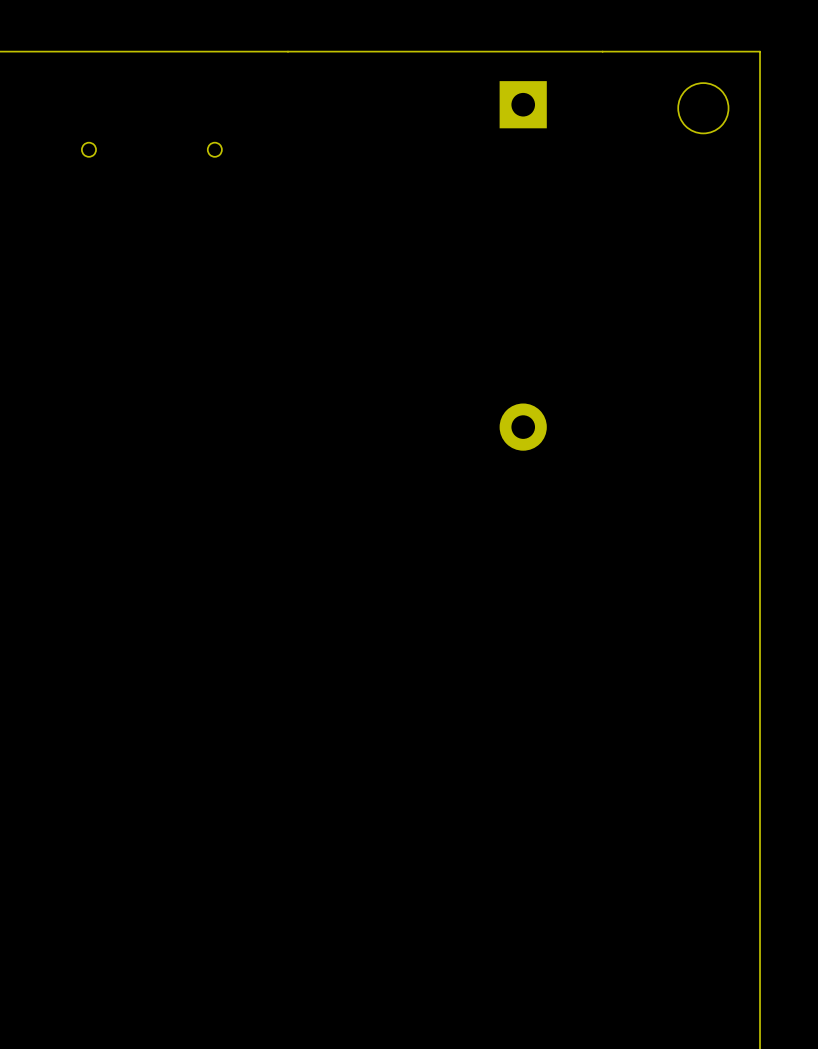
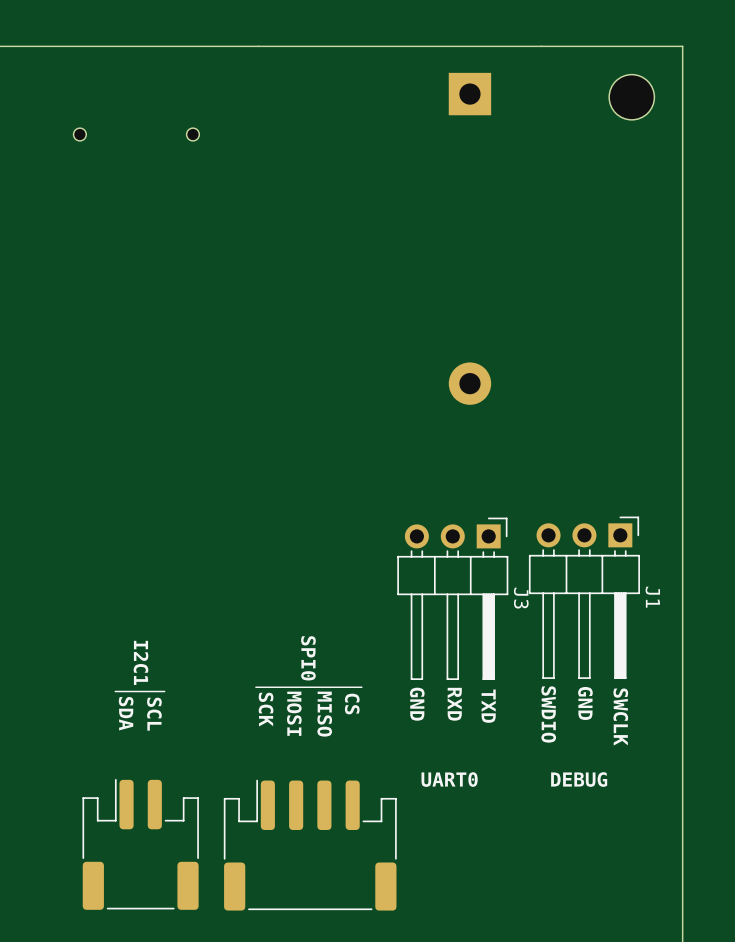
J1: none -> (584, 597)
J3: none -> (452, 598)
text: none -> SPI0 (308, 658)
text: none -> I2C1 (140, 662)
line: none -> (361, 687) (255, 687)
line: none -> (164, 691) (115, 691)
text: none -> CS (352, 704)
text: none -> TXD (488, 706)
text: none -> GND (585, 703)
text: none -> GND (417, 704)
text: none -> RXD (454, 704)
text: none -> SCK (266, 709)
text: none -> SDA (126, 713)
text: none -> SCL (154, 714)
text: none -> MOSI (294, 713)
text: none -> MISO (324, 714)
text: none -> SWDIO (548, 714)
text: none -> SWCLK (620, 717)
text: none -> UART0 (449, 779)
text: none -> DEBUG (579, 779)
part: none -> (140, 844)
part: none -> (310, 845)

